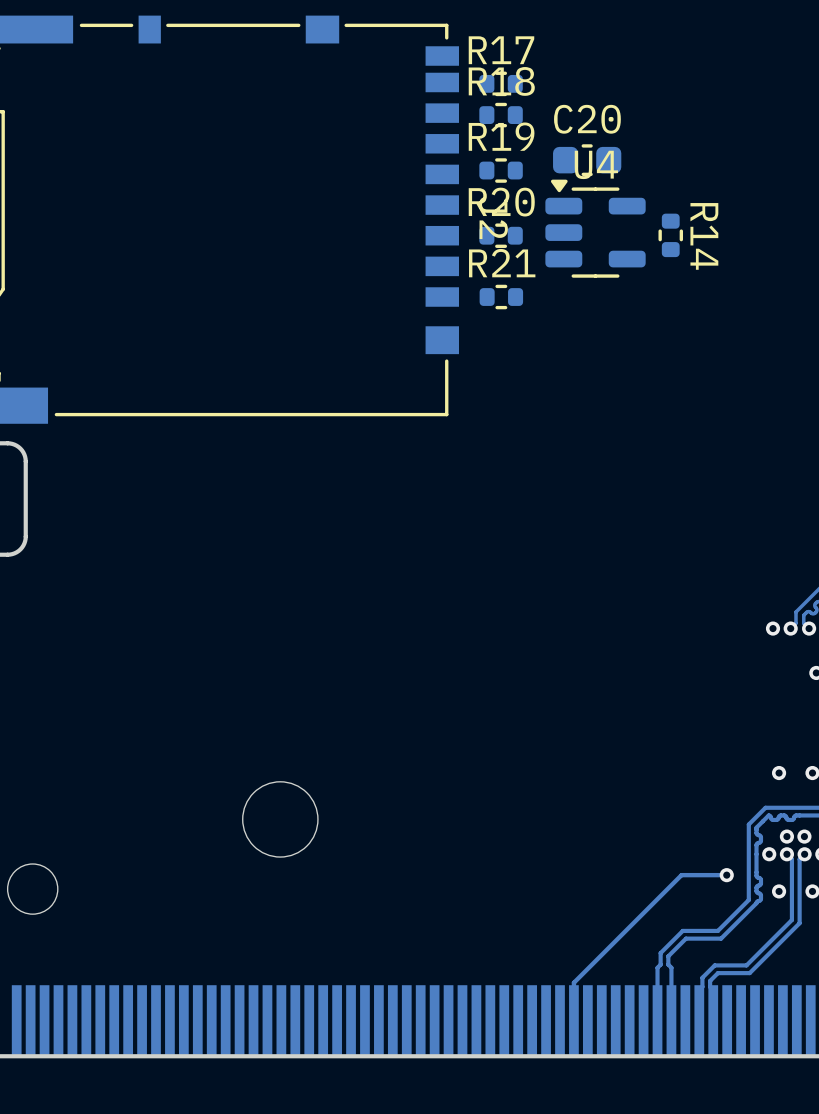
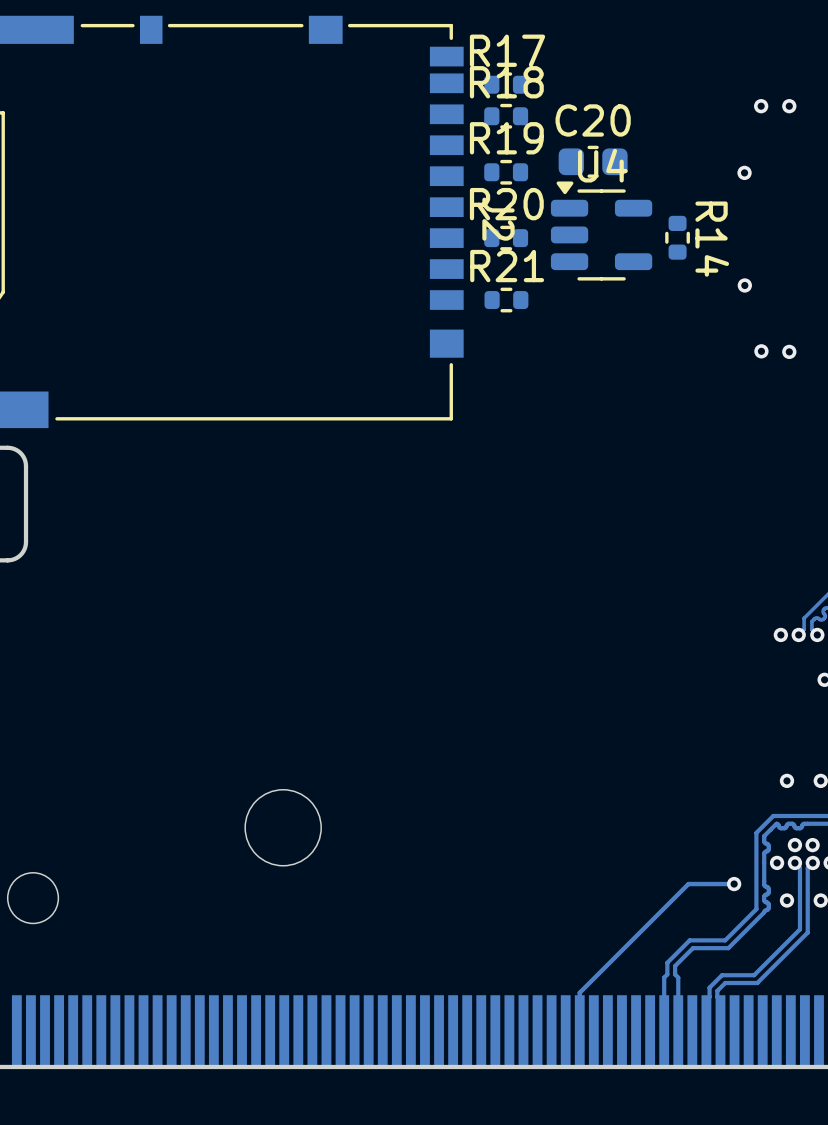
via: none -> (761, 106)
via: none -> (789, 106)
via: none -> (744, 172)
via: none -> (744, 285)
via: none -> (761, 351)
via: none -> (789, 351)

